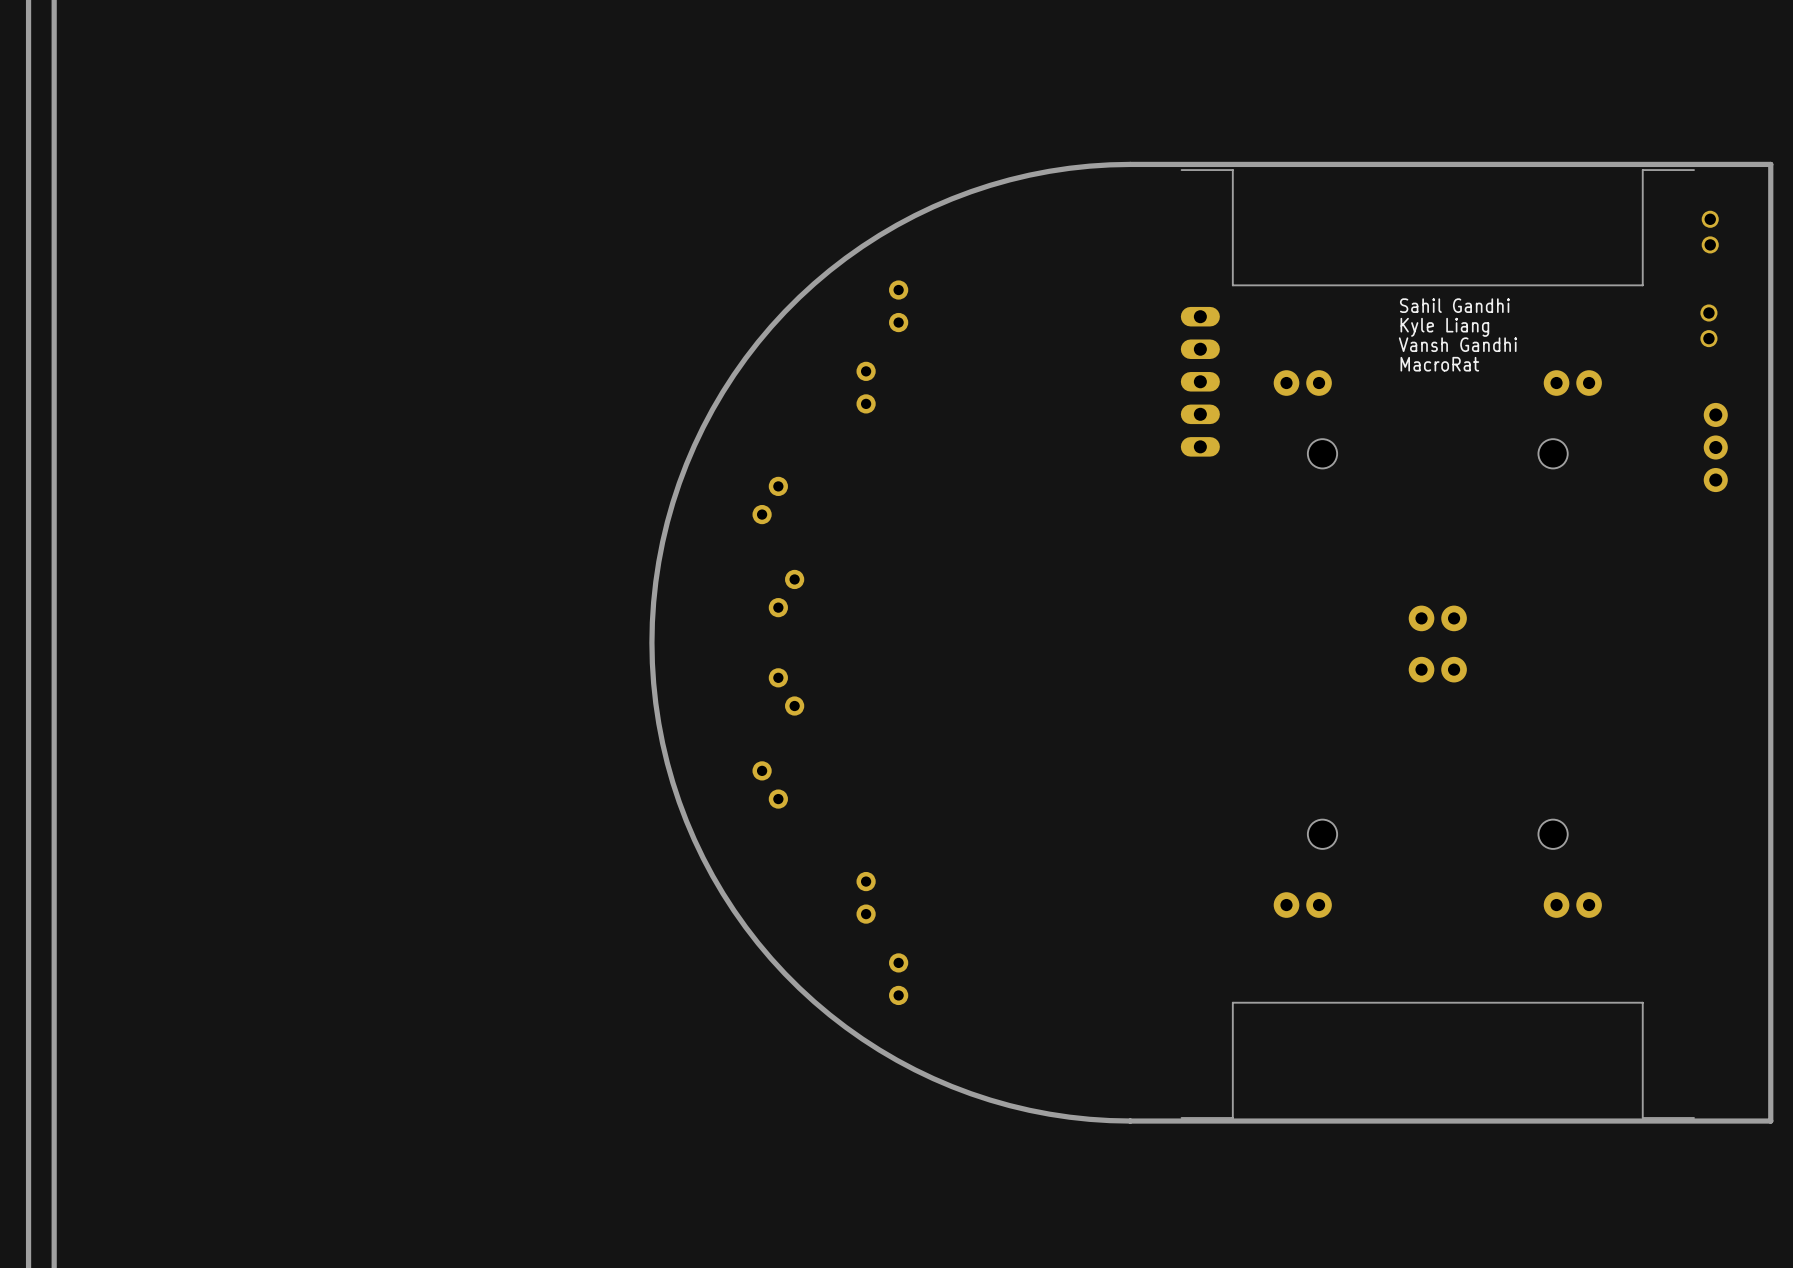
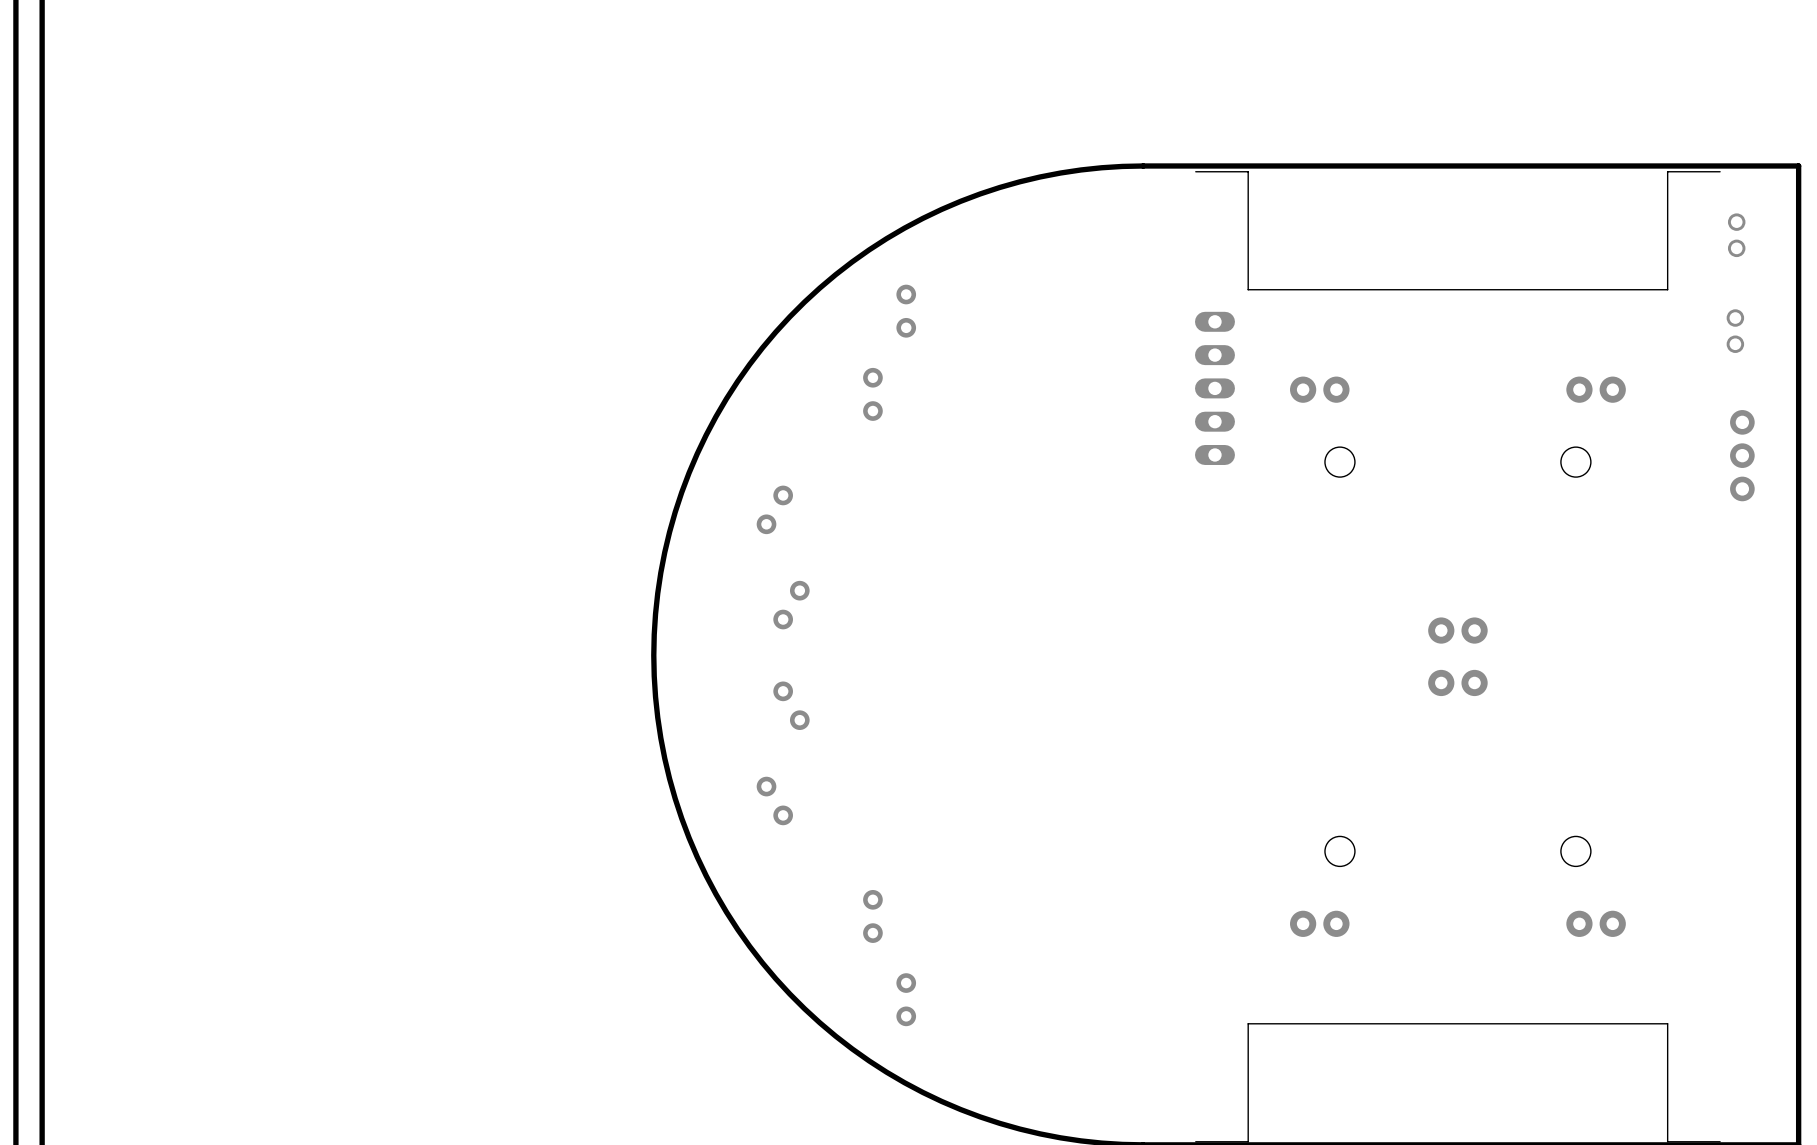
text: Sahil Gandhi (1454, 305) -> none
text: Kyle Liang (1444, 327) -> none
text: Vansh Gandhi (1457, 344) -> none
text: MacroRat (1439, 364) -> none

